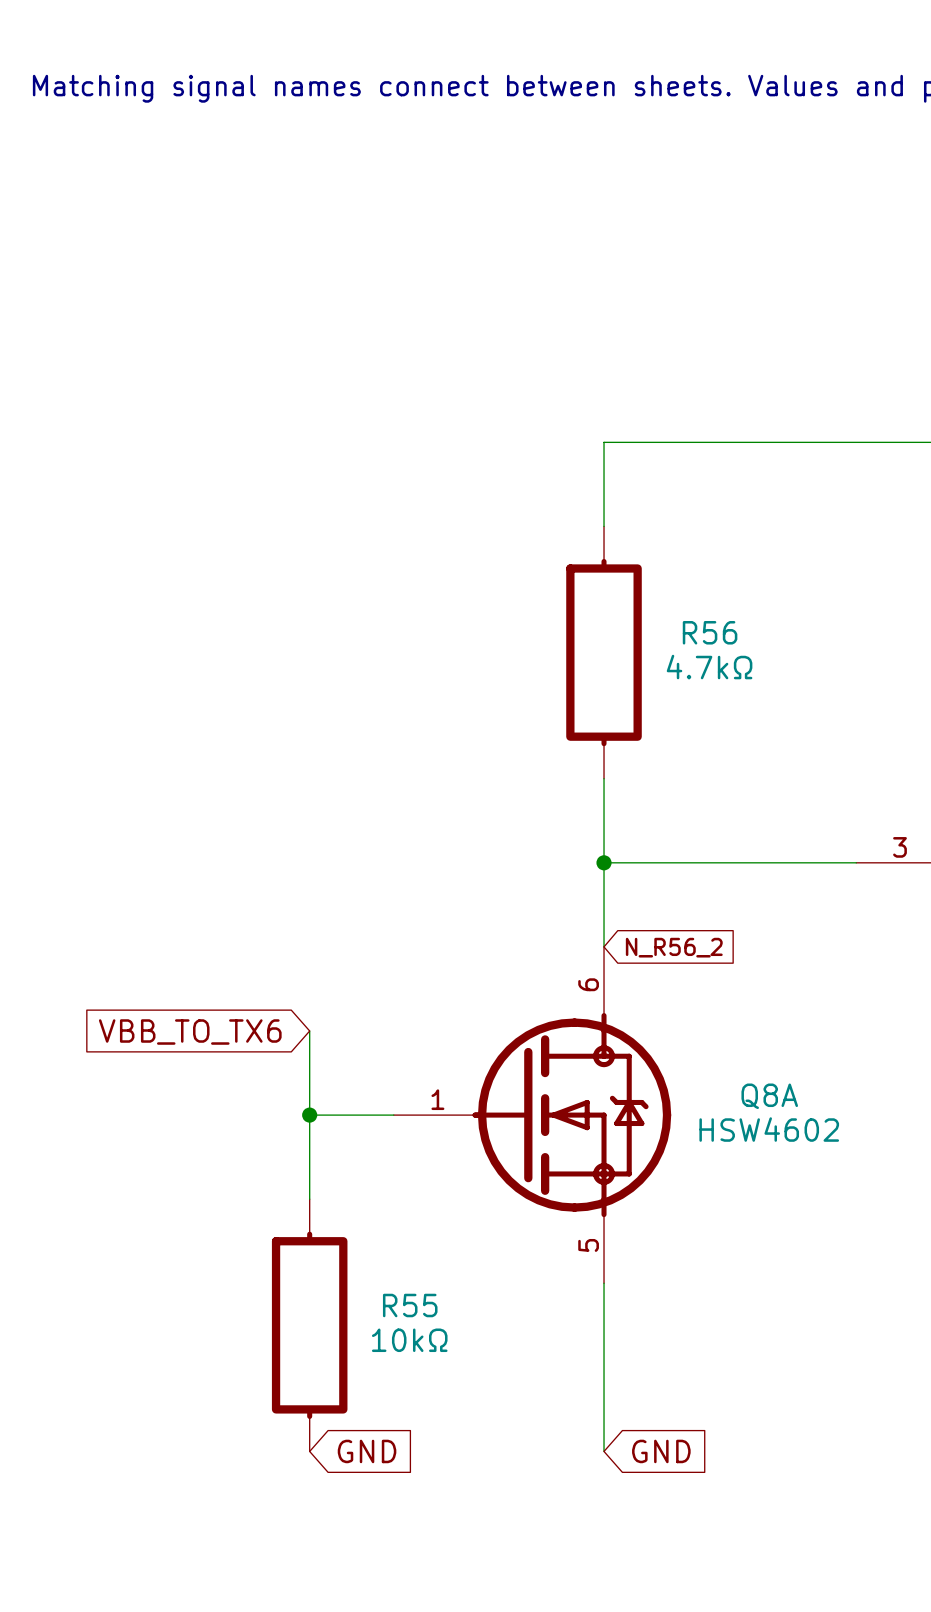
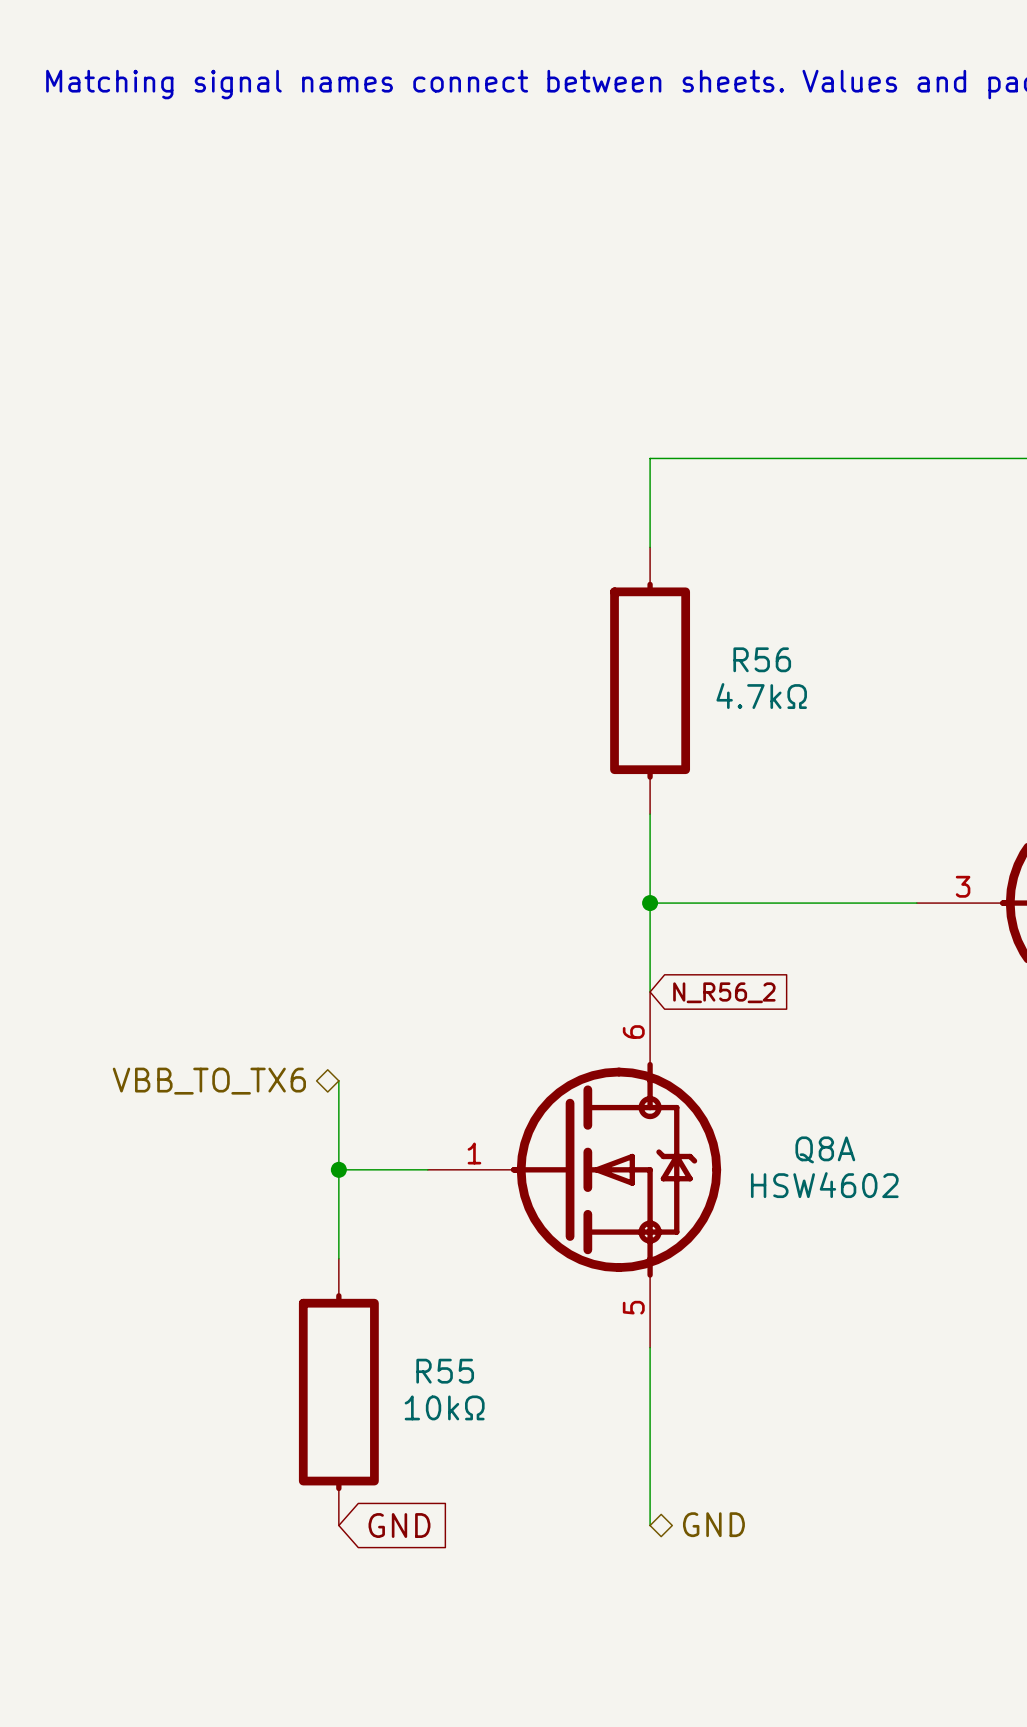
hierarchical label: none -> VBB_TO_TX6 (209, 1081)
global label: VBB_TO_TX6 (190, 1032) -> none
hierarchical label: none -> GND (713, 1524)
global label: GND (661, 1451) -> none

